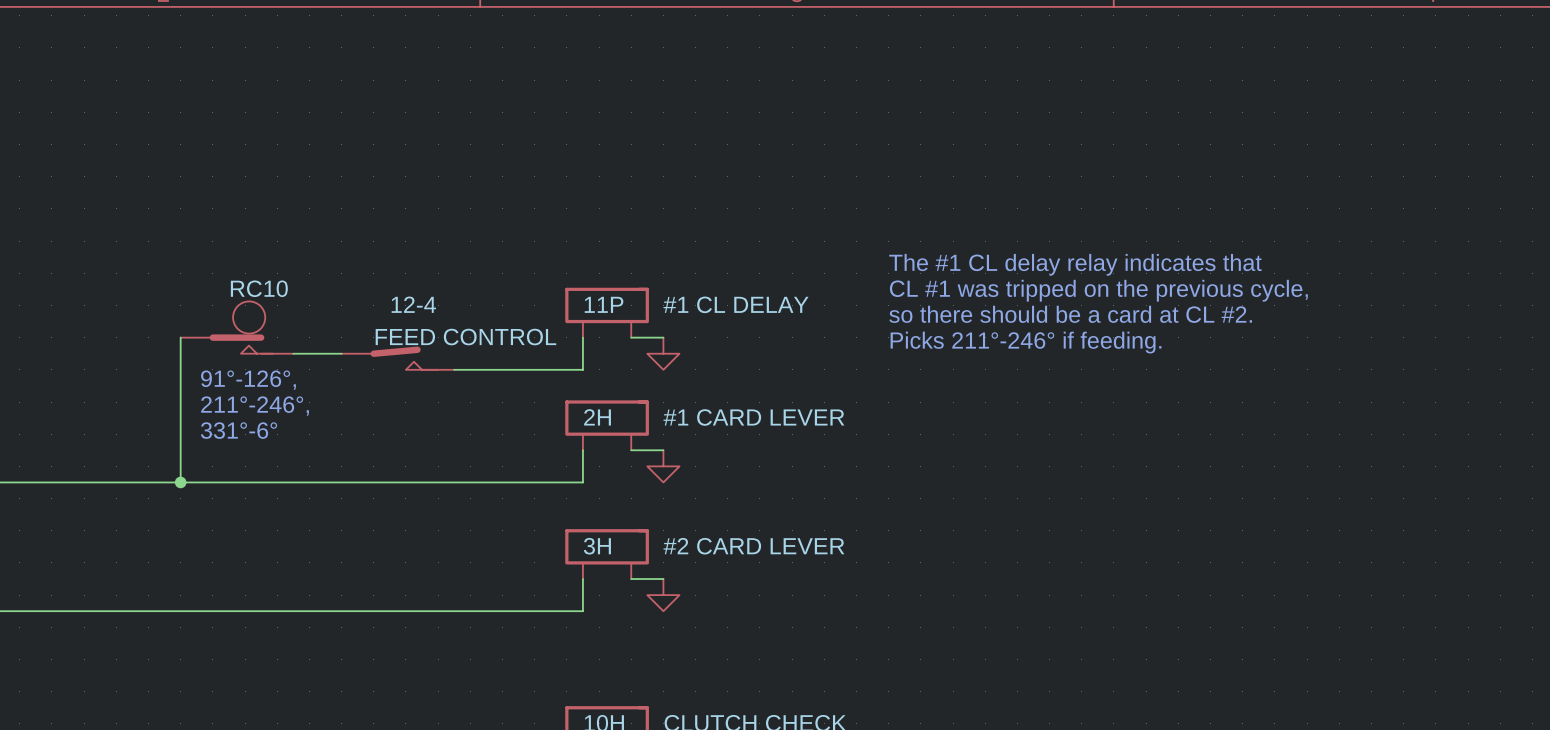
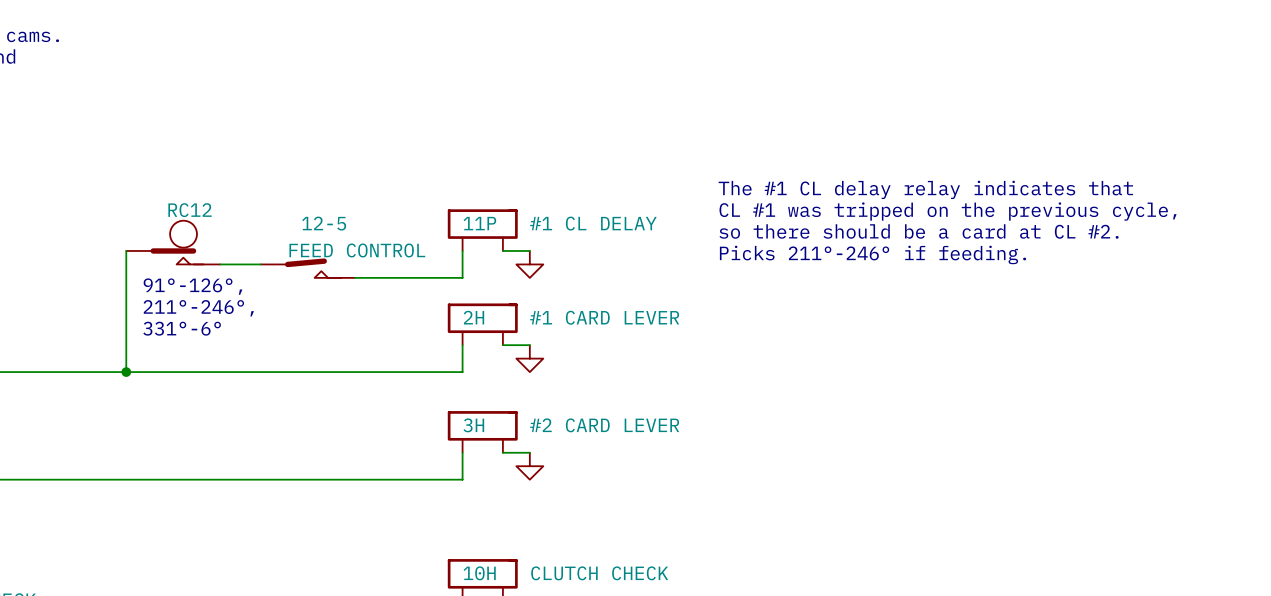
RC10 name: RC10 (259, 288) -> RC12 (190, 210)
12-4 name: 12-4 (413, 304) -> 12-5 (324, 223)

